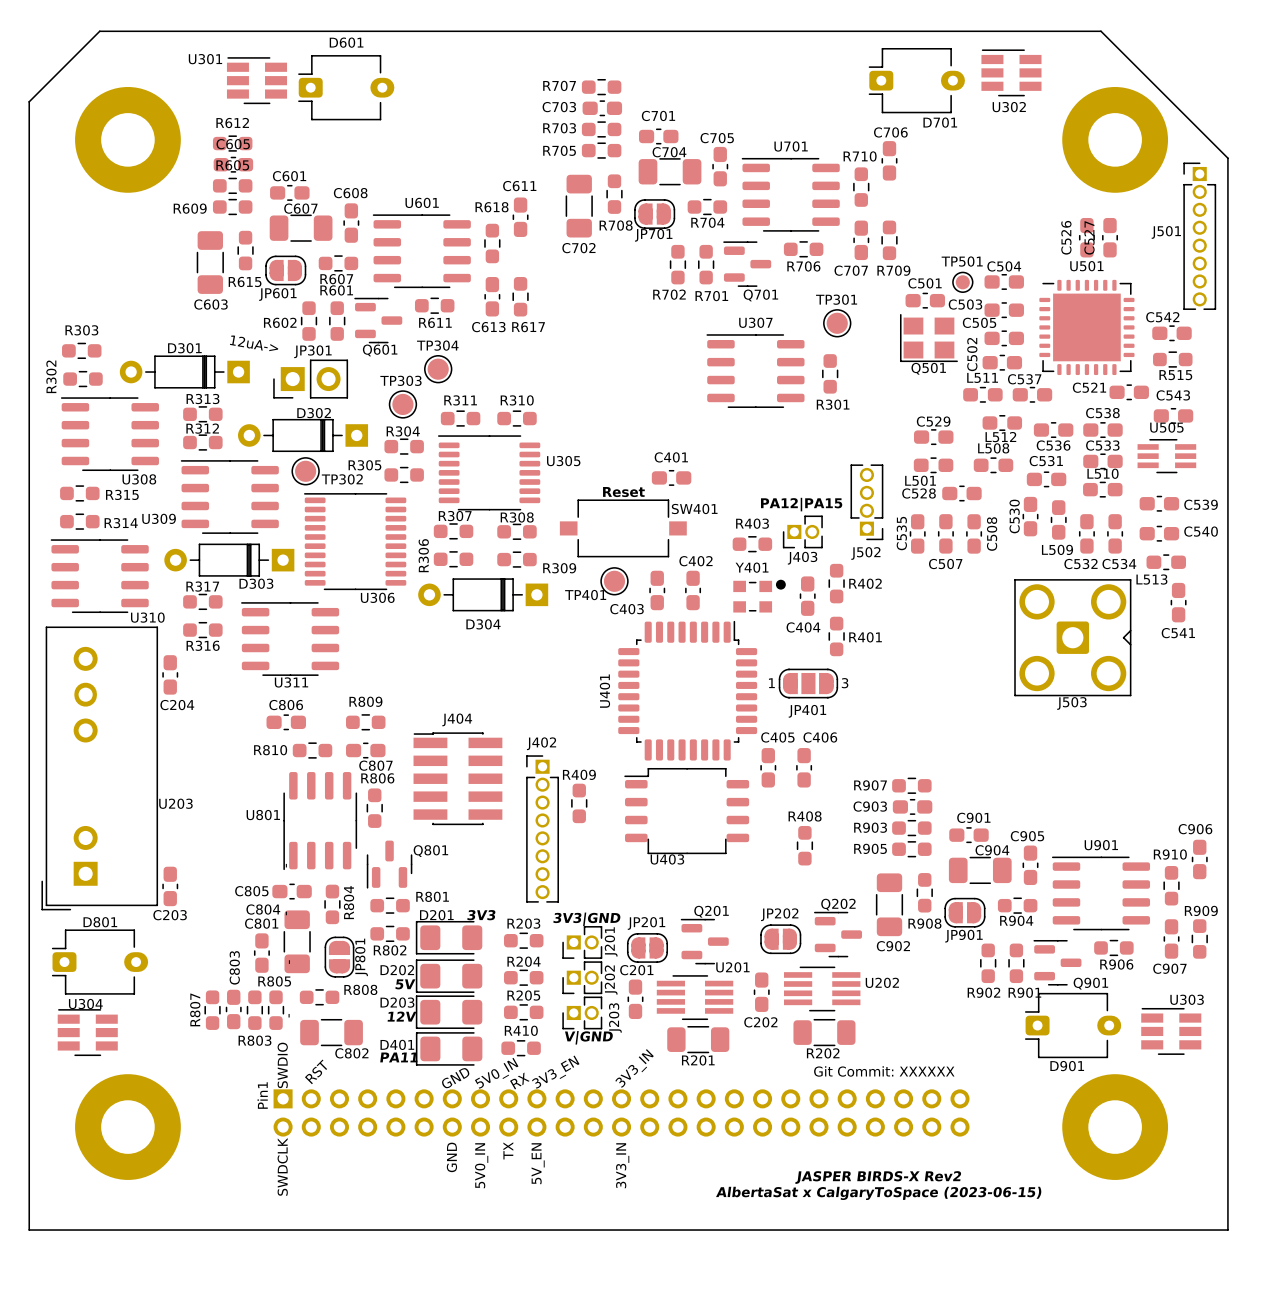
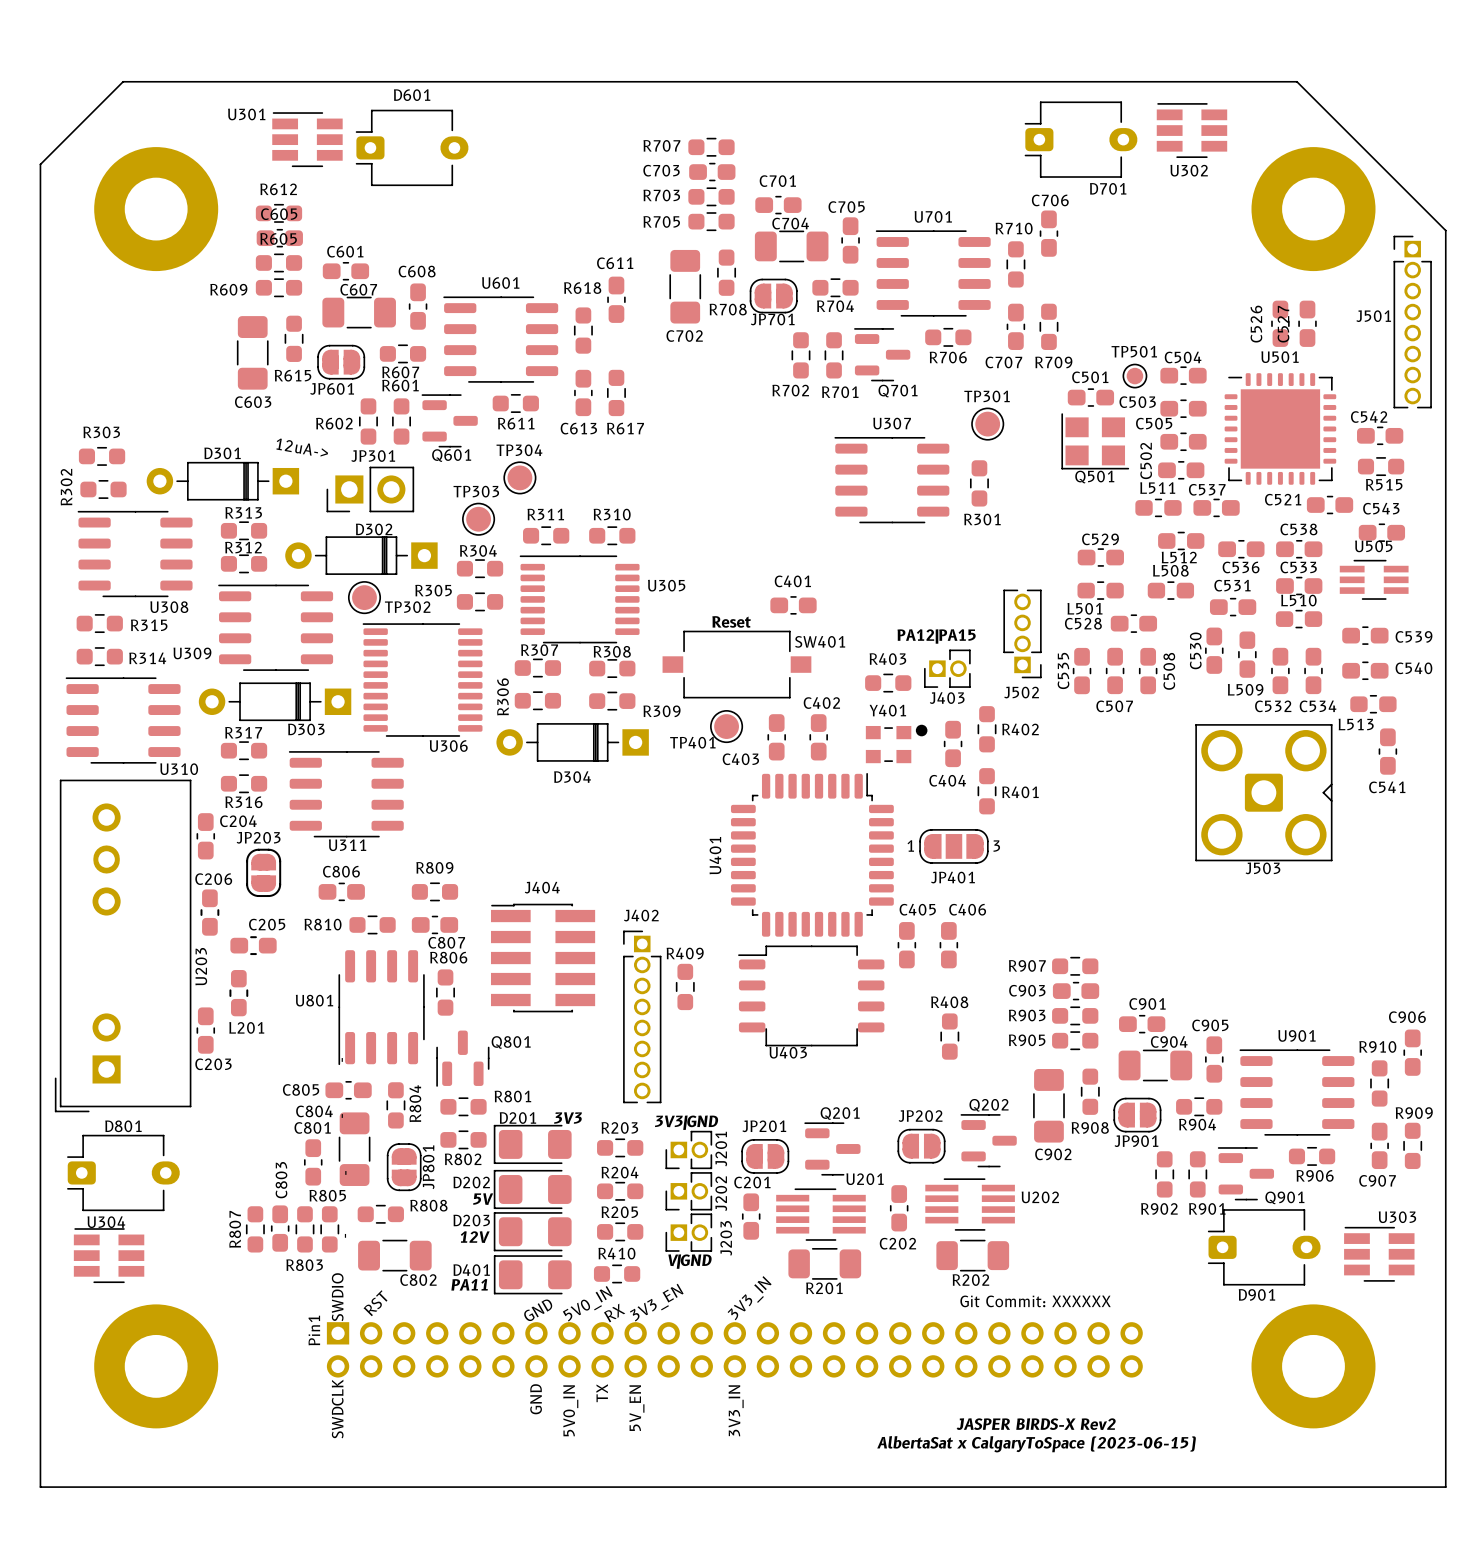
C204 name position: C204 (177, 705) -> C204 (238, 821)
JP203: none -> (263, 872)
C206: none -> (209, 912)
C205: none -> (253, 945)
U203 name rotation: 0° (175, 803) -> 90° counterclockwise (201, 966)
L201: none -> (238, 993)
C203 position: (170, 886) -> (205, 1030)
C203 name position: C203 (170, 915) -> C203 (213, 1064)

